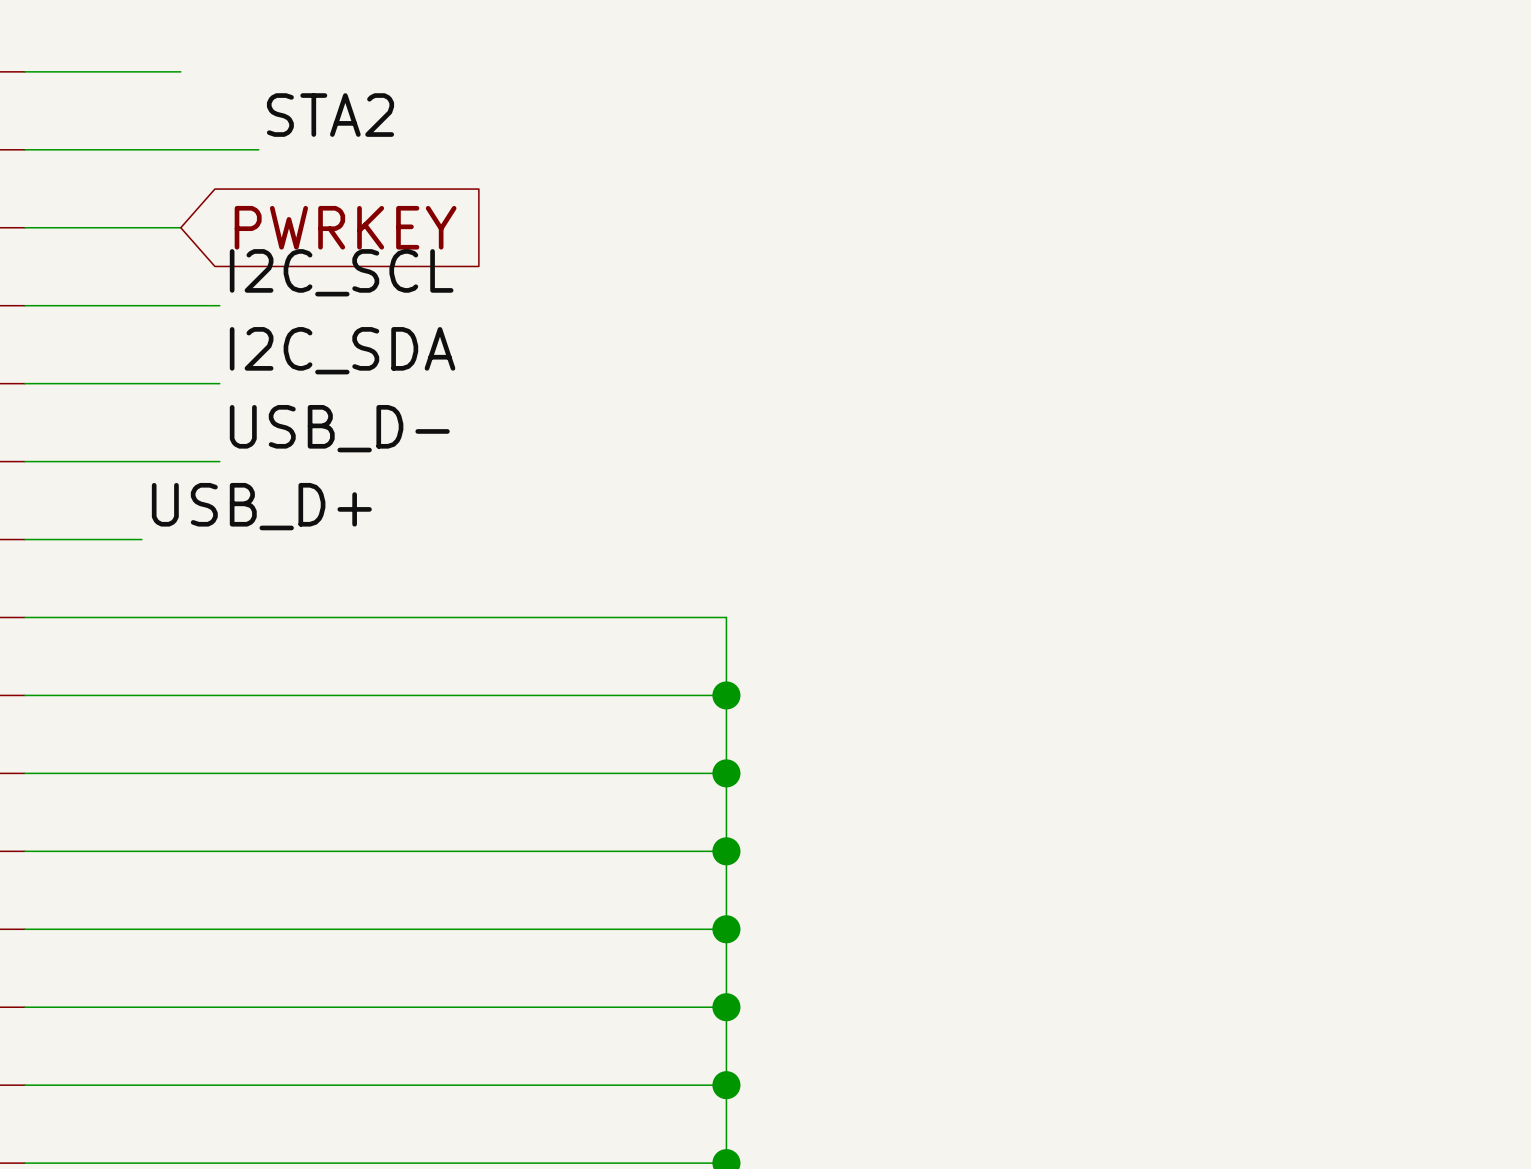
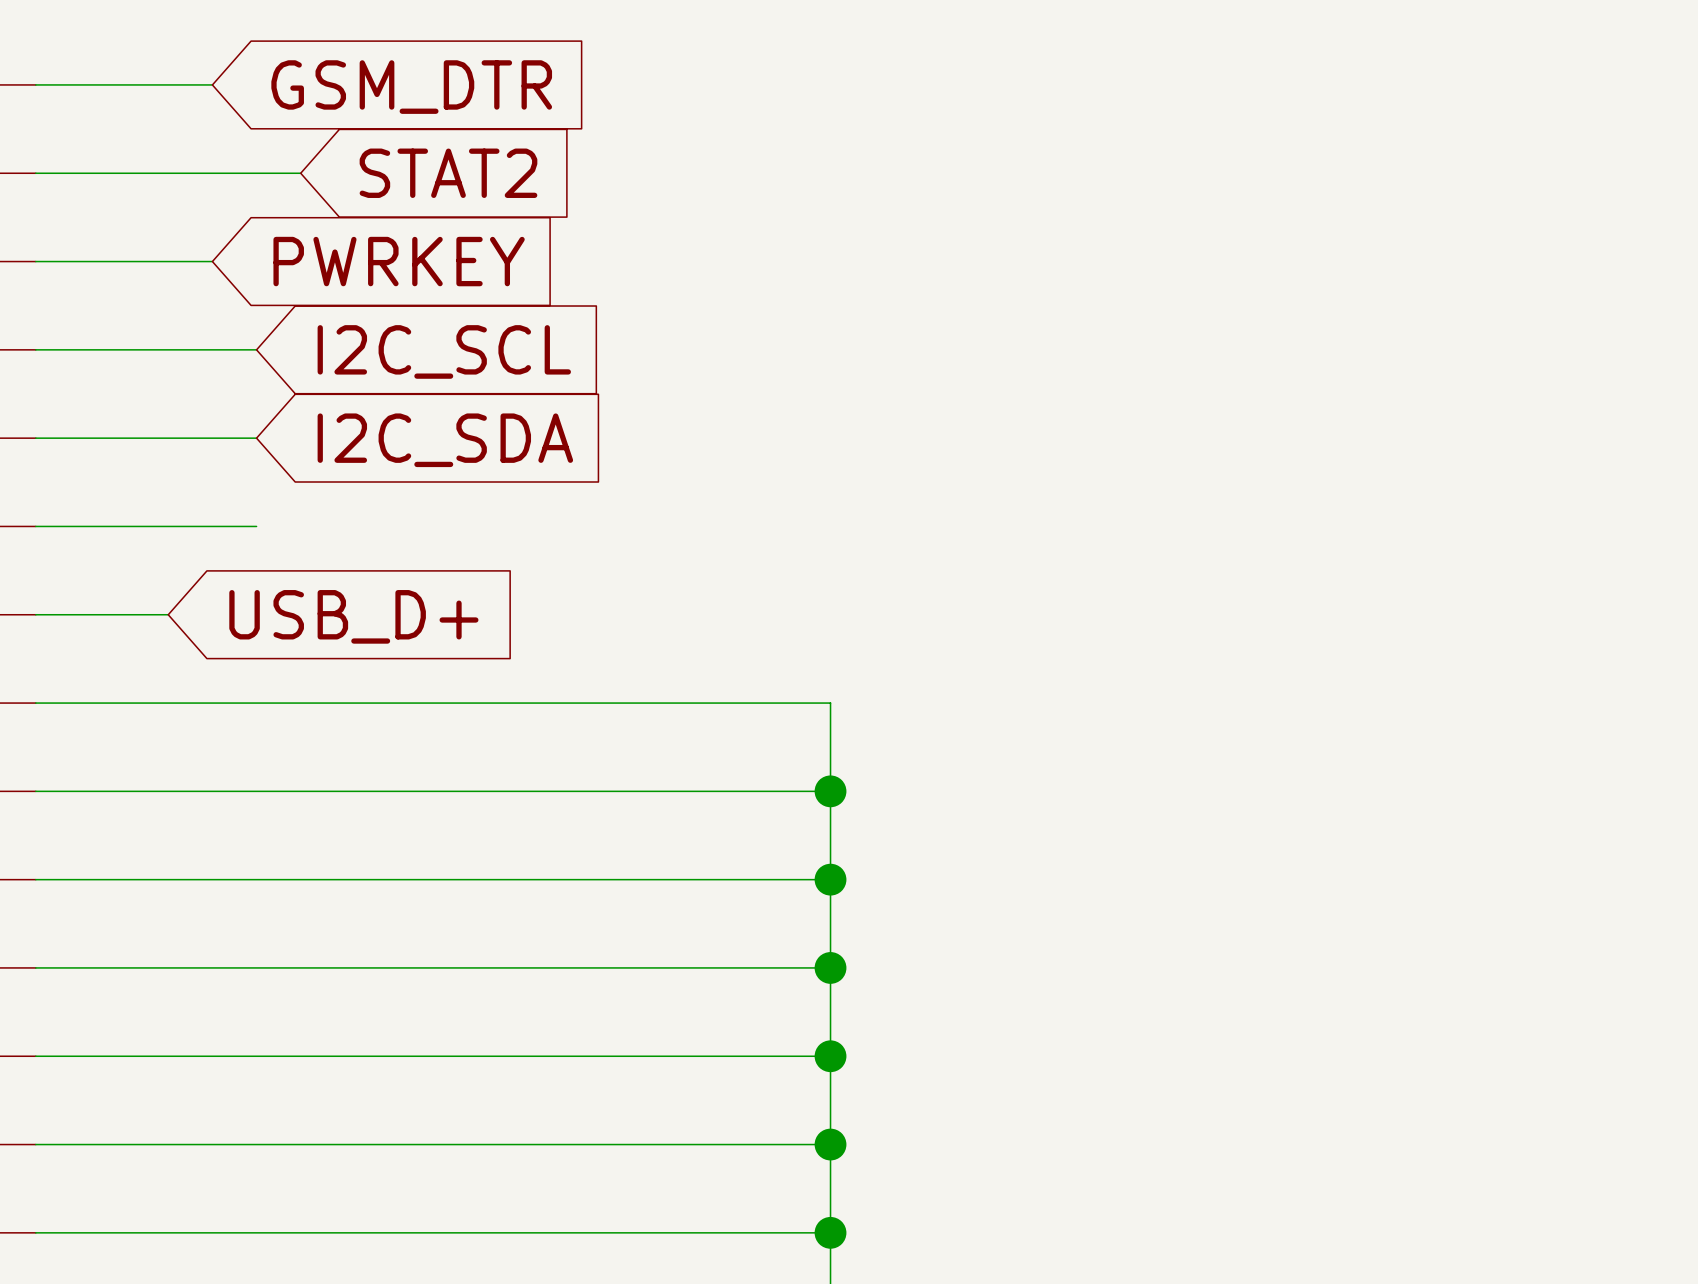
global label: none -> GSM_DTR (411, 87)
label: STA2 (330, 115) -> none
global label: none -> STAT2 (448, 173)
label: I2C_SCL (341, 272) -> none
global label: none -> I2C_SCL (444, 351)
label: I2C_SDA (342, 350) -> none
global label: none -> I2C_SDA (445, 440)
label: USB_D- (339, 428) -> none
label: USB_D+ (261, 506) -> none
global label: none -> USB_D+ (353, 616)

